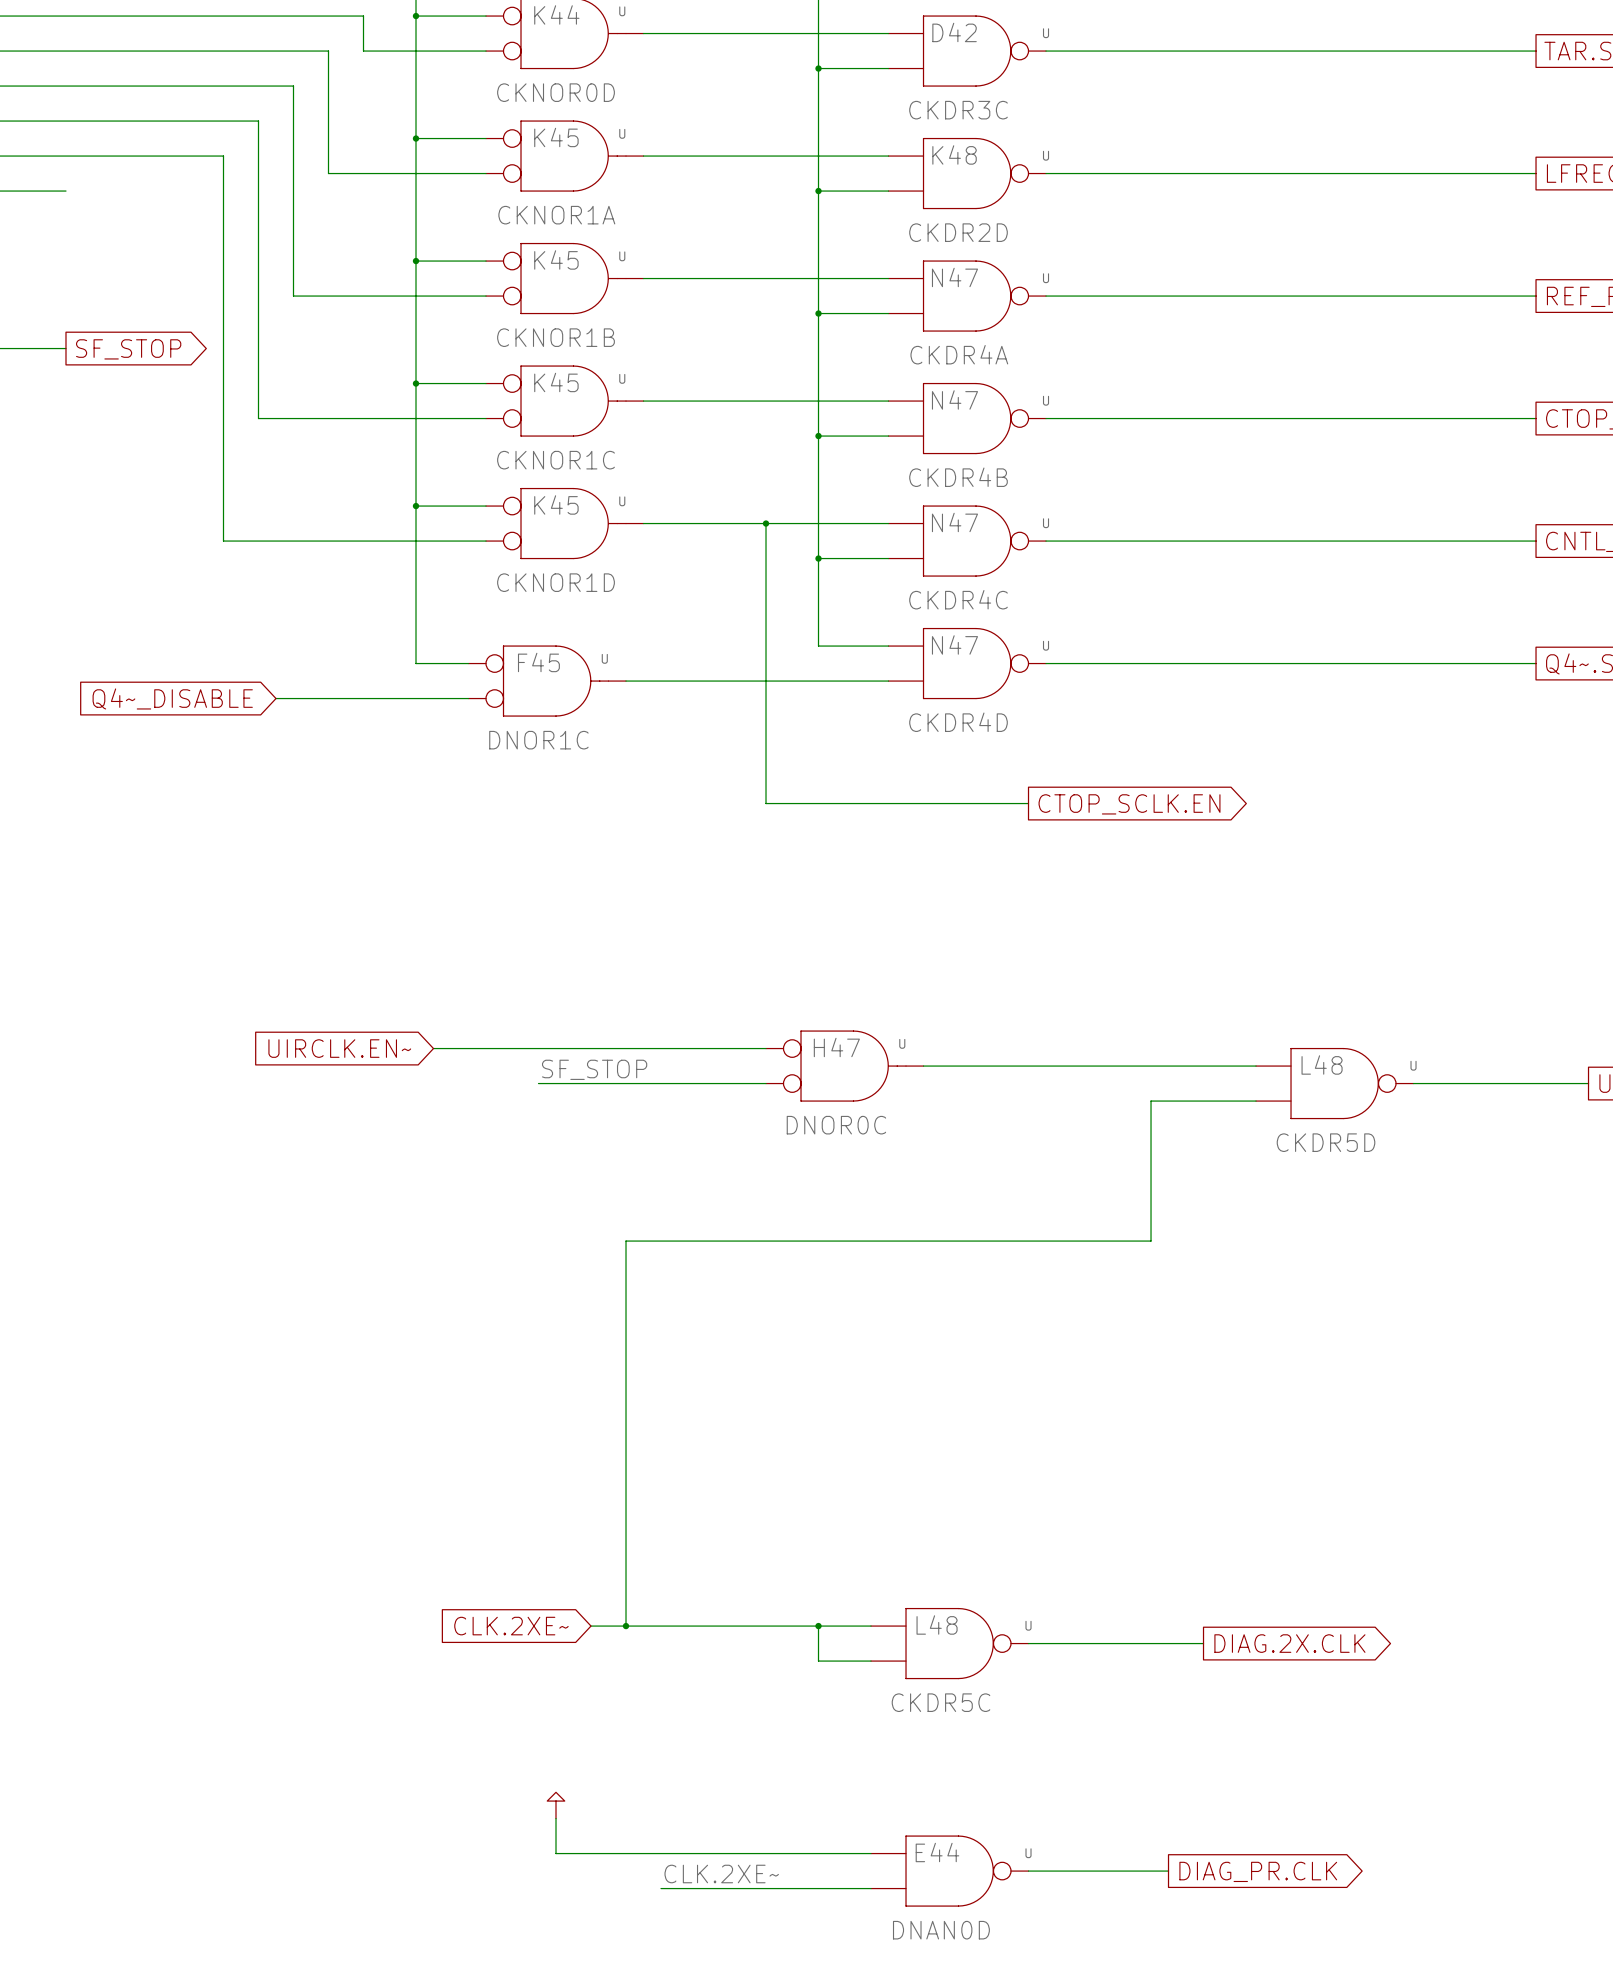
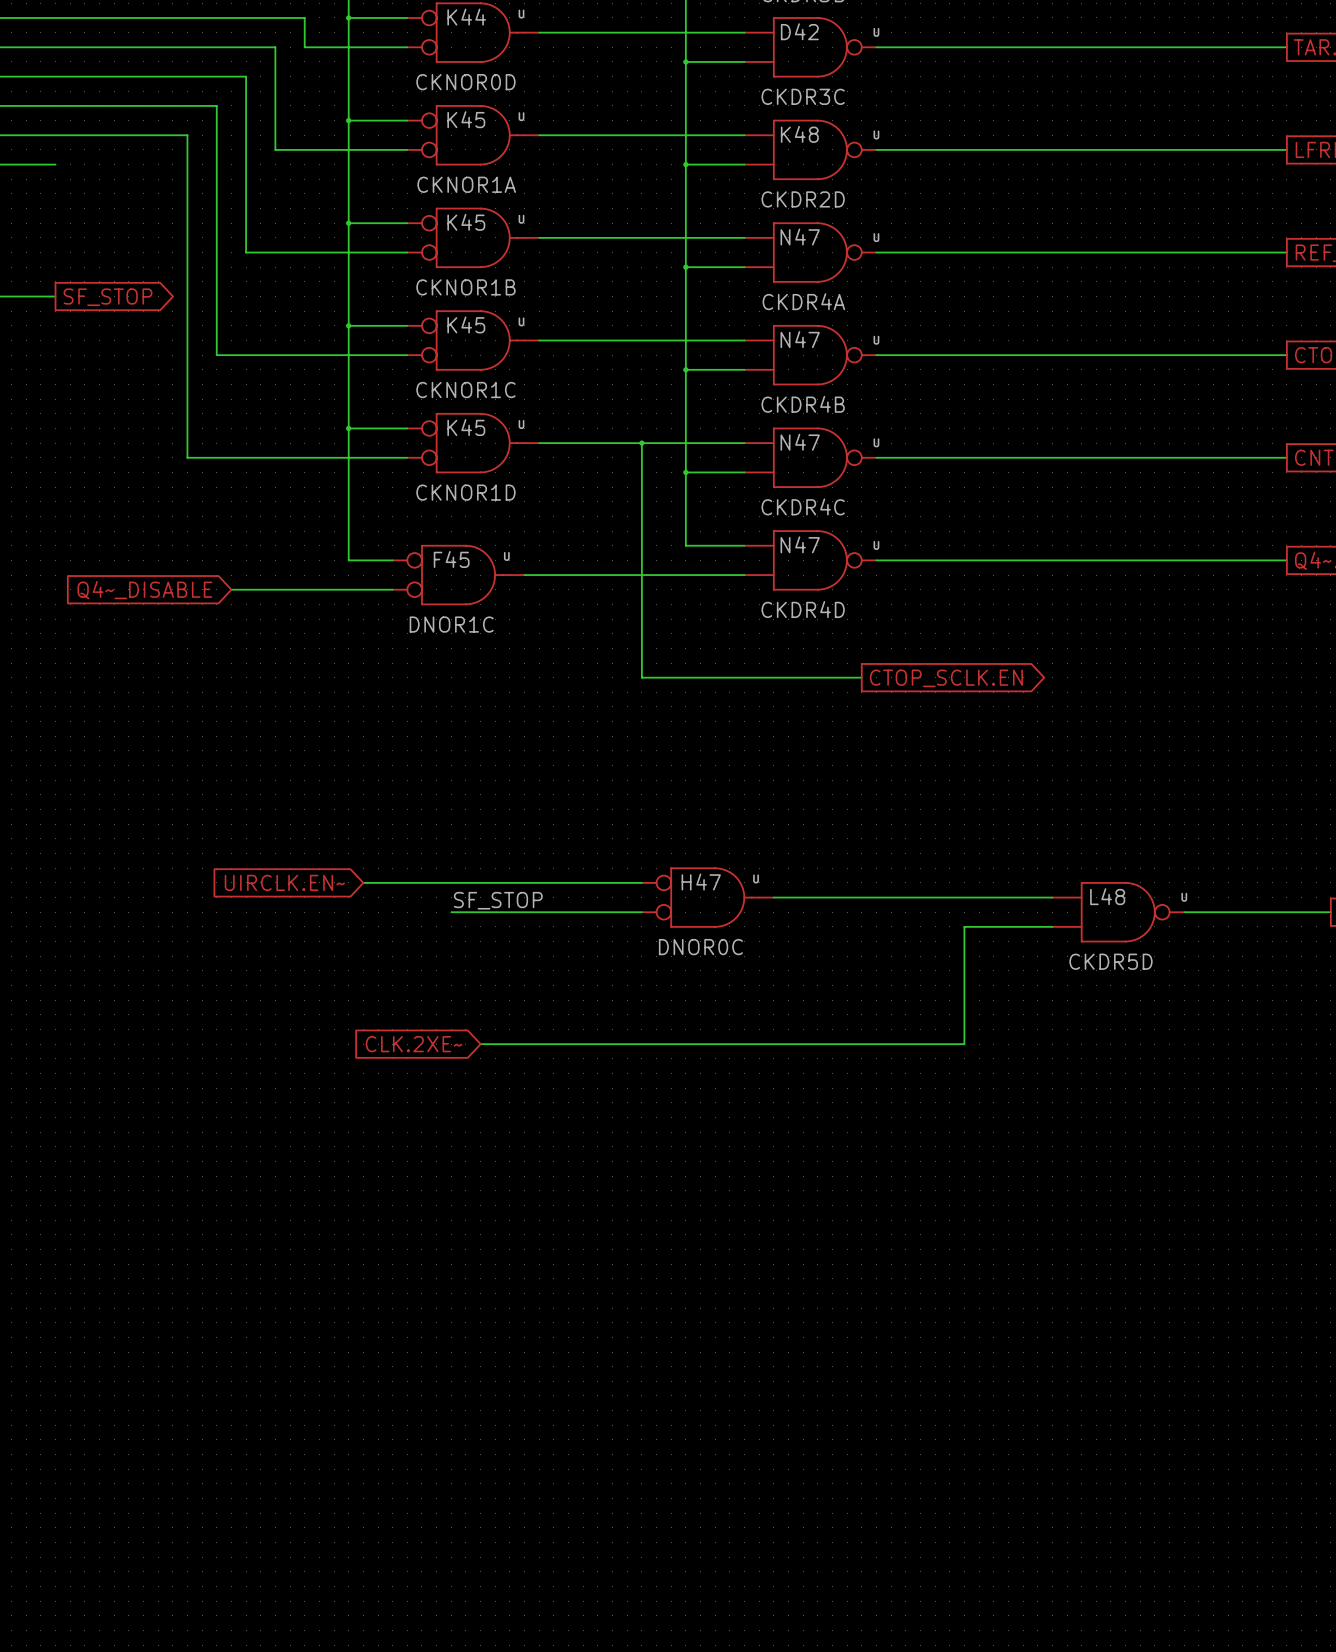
global label: none -> CLK.2XE~ (413, 1044)
wire: (626, 1241) (626, 1626) -> (524, 1044) (480, 1044)
global label: CLK.2XE~ (511, 1626) -> none
wire: (591, 1626) (871, 1626) -> none
junction: (626, 1626) -> none
wire: (818, 1626) (818, 1661) (871, 1661) -> none
junction: (818, 1626) -> none
U: (949, 1643) -> none
wire: (1028, 1643) (1203, 1643) -> none
global label: DIAG.2X.CLK (1289, 1643) -> none
power symbol: (556, 1805) -> none
wire: (556, 1818) (556, 1853) (871, 1853) -> none
U: (949, 1871) -> none
wire: (1028, 1871) (1168, 1871) -> none
global label: DIAG_PR.CLK (1258, 1871) -> none
label: CLK.2XE~ (721, 1874) -> none
wire: (661, 1888) (871, 1888) -> none

